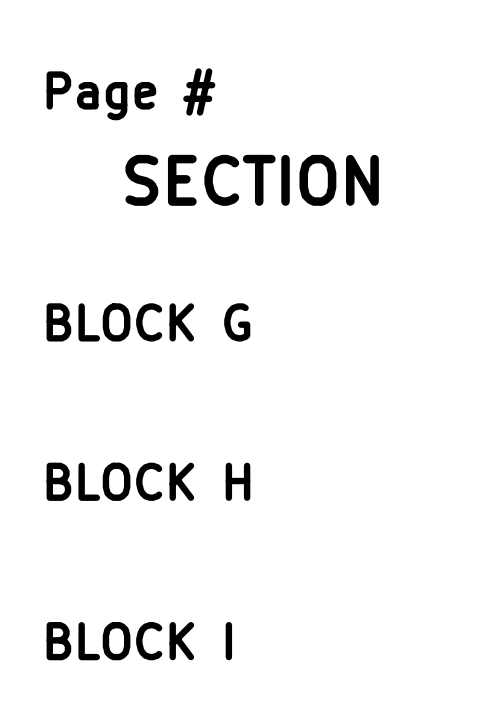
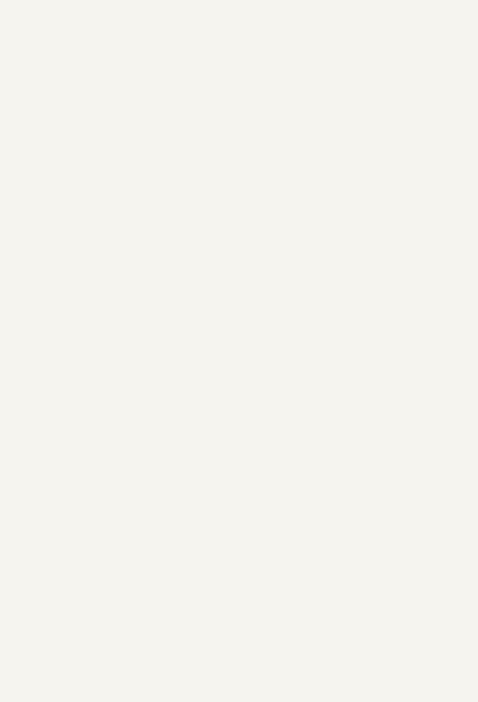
text: Page # (130, 94) -> none
text: SECTION (252, 180) -> none
text: BLOCK G (148, 322) -> none
text: BLOCK H (148, 481) -> none
text: BLOCK I (139, 641) -> none

